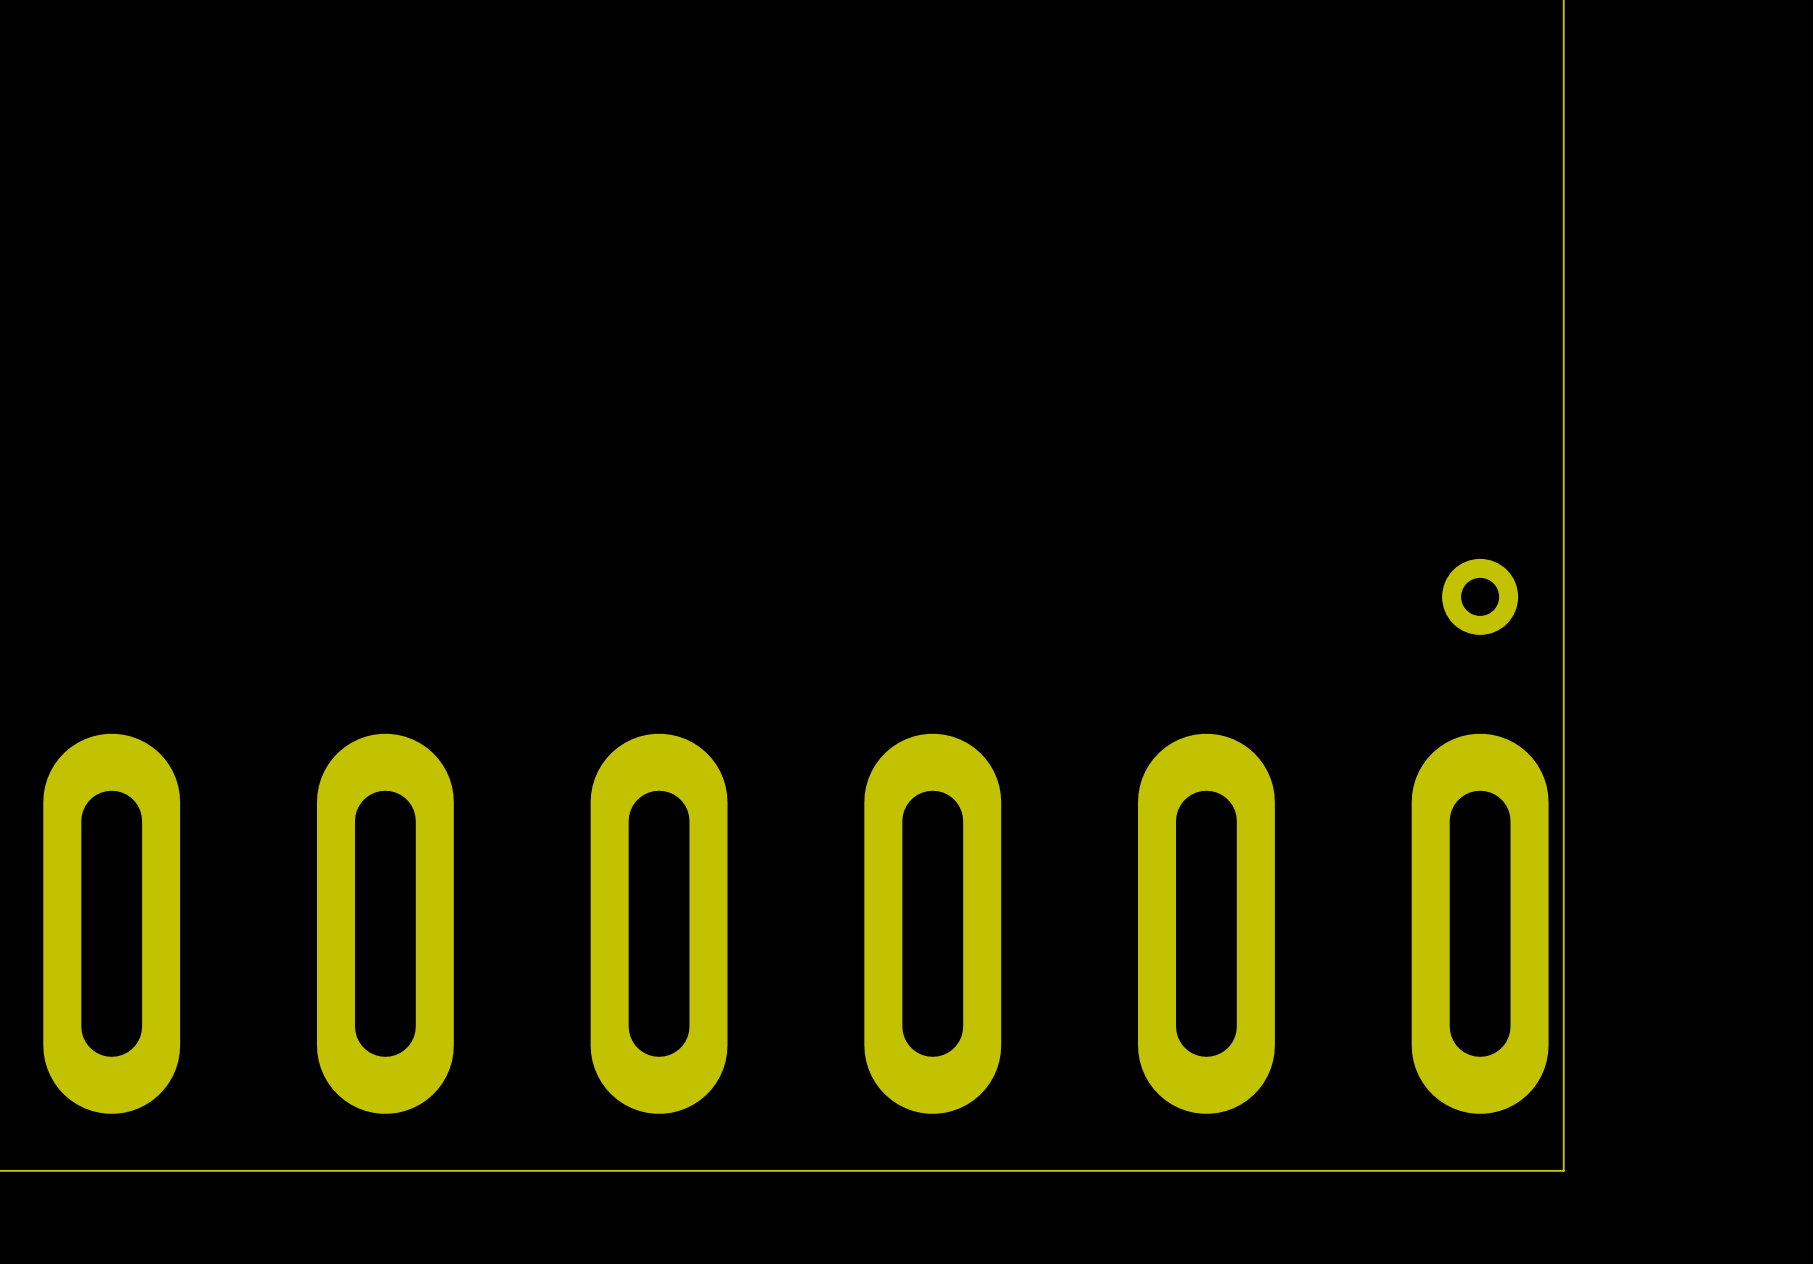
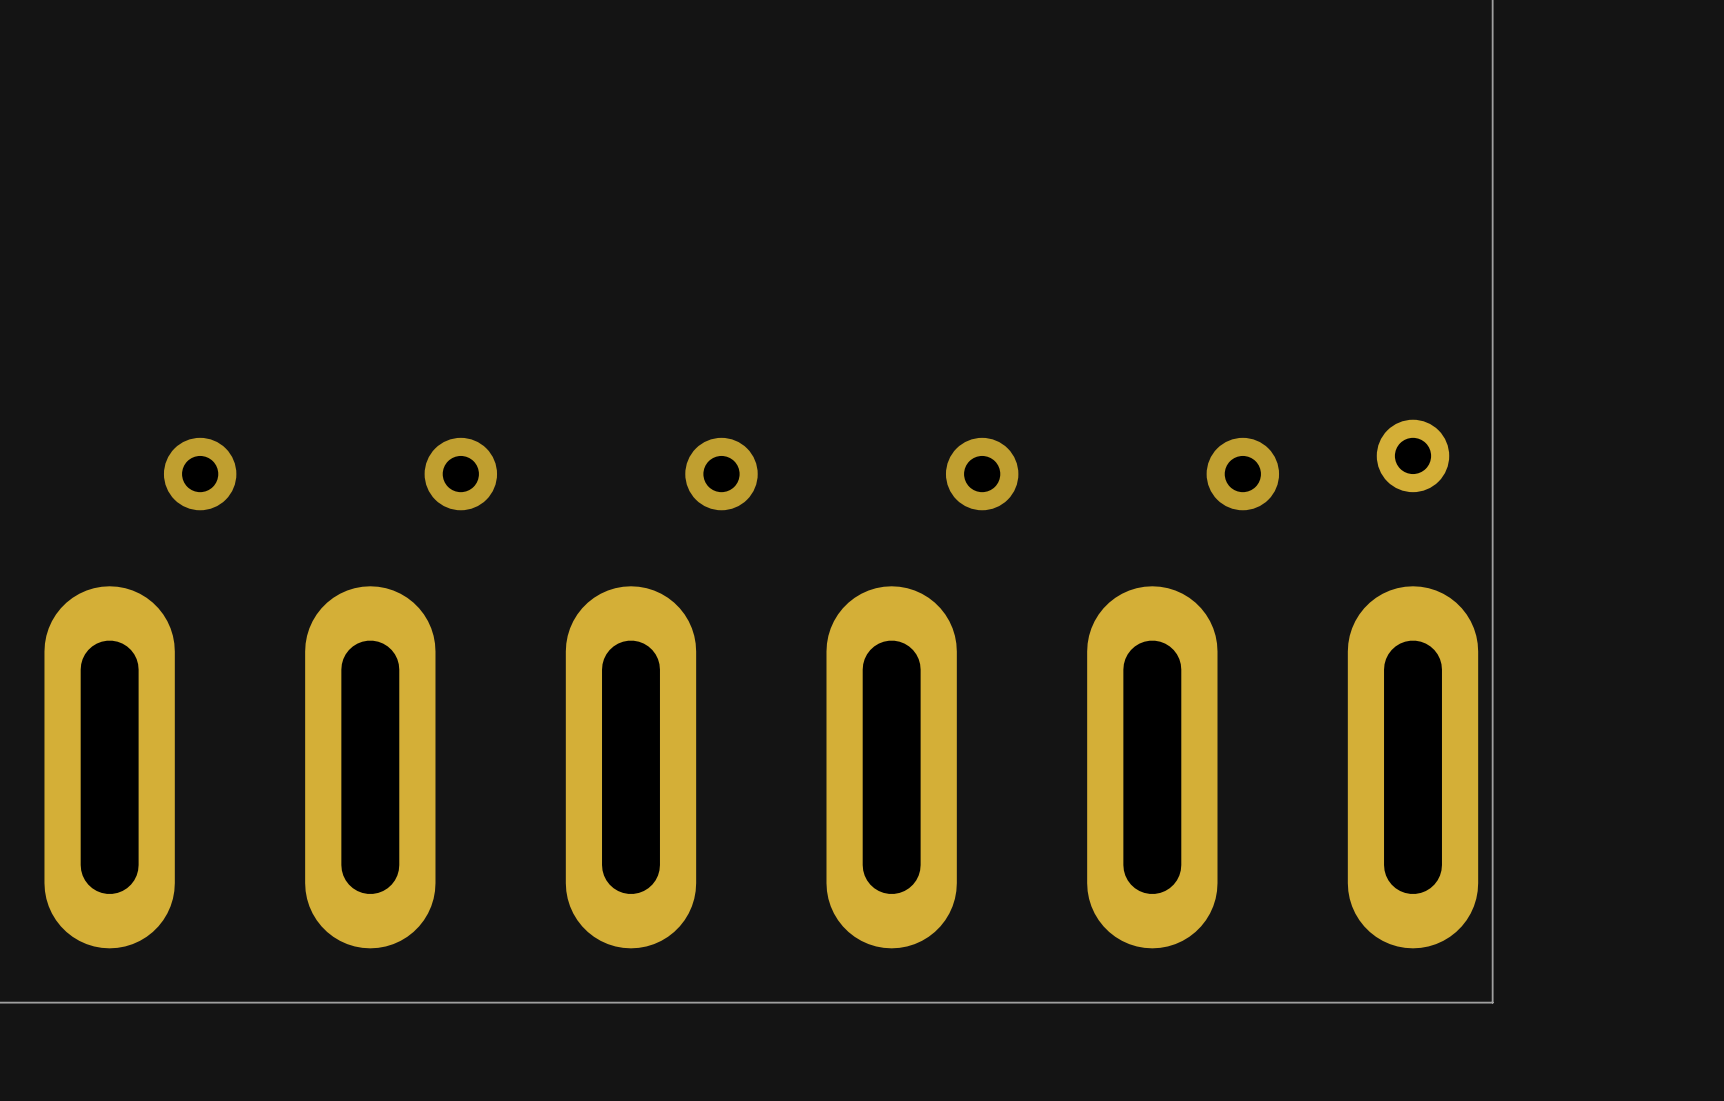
via: none -> (200, 474)
via: none -> (460, 474)
via: none -> (721, 474)
via: none -> (982, 474)
via: none -> (1242, 474)

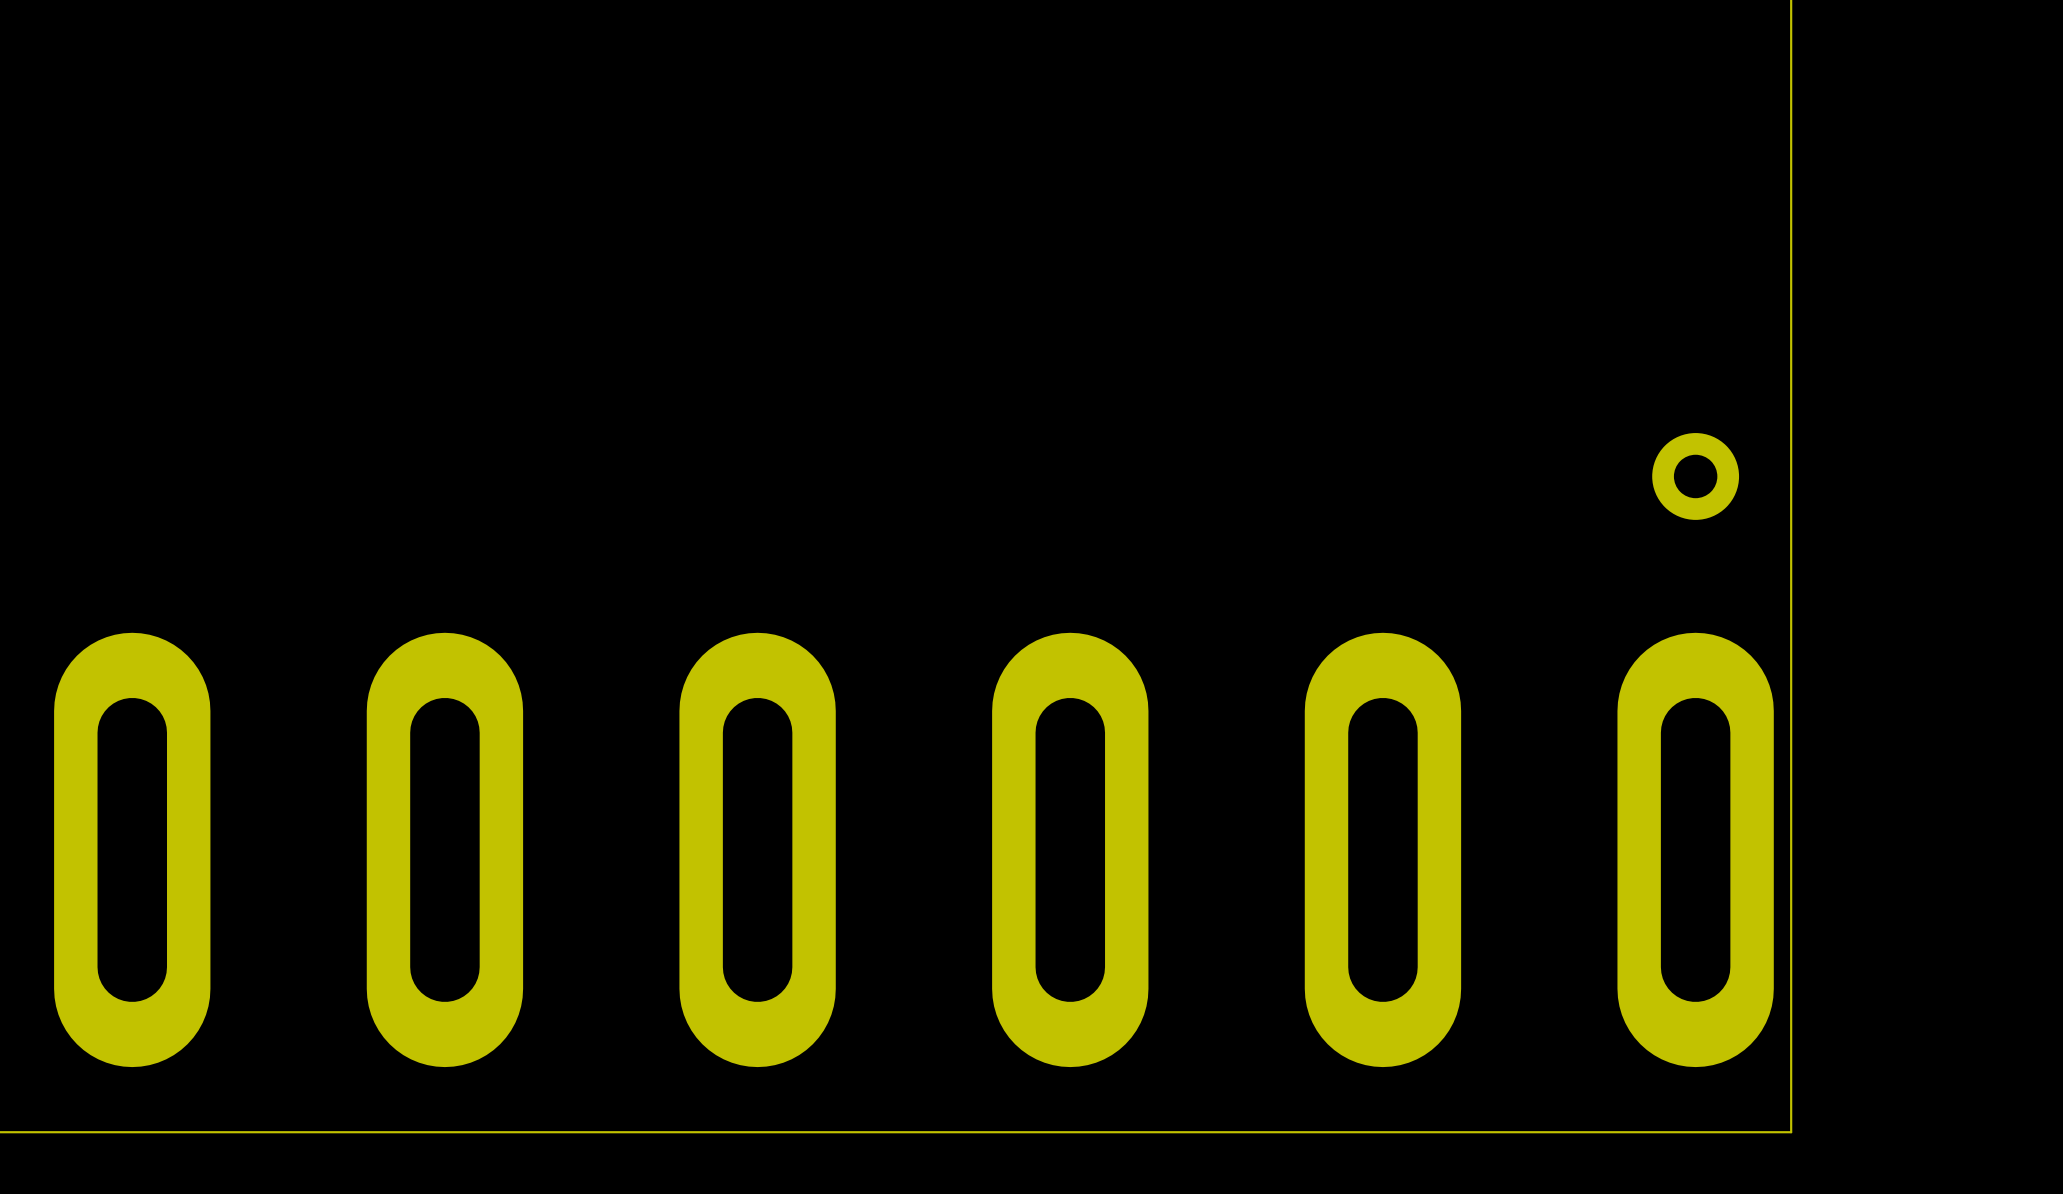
via: (200, 474) -> none
via: (460, 474) -> none
via: (721, 474) -> none
via: (982, 474) -> none
via: (1242, 474) -> none

